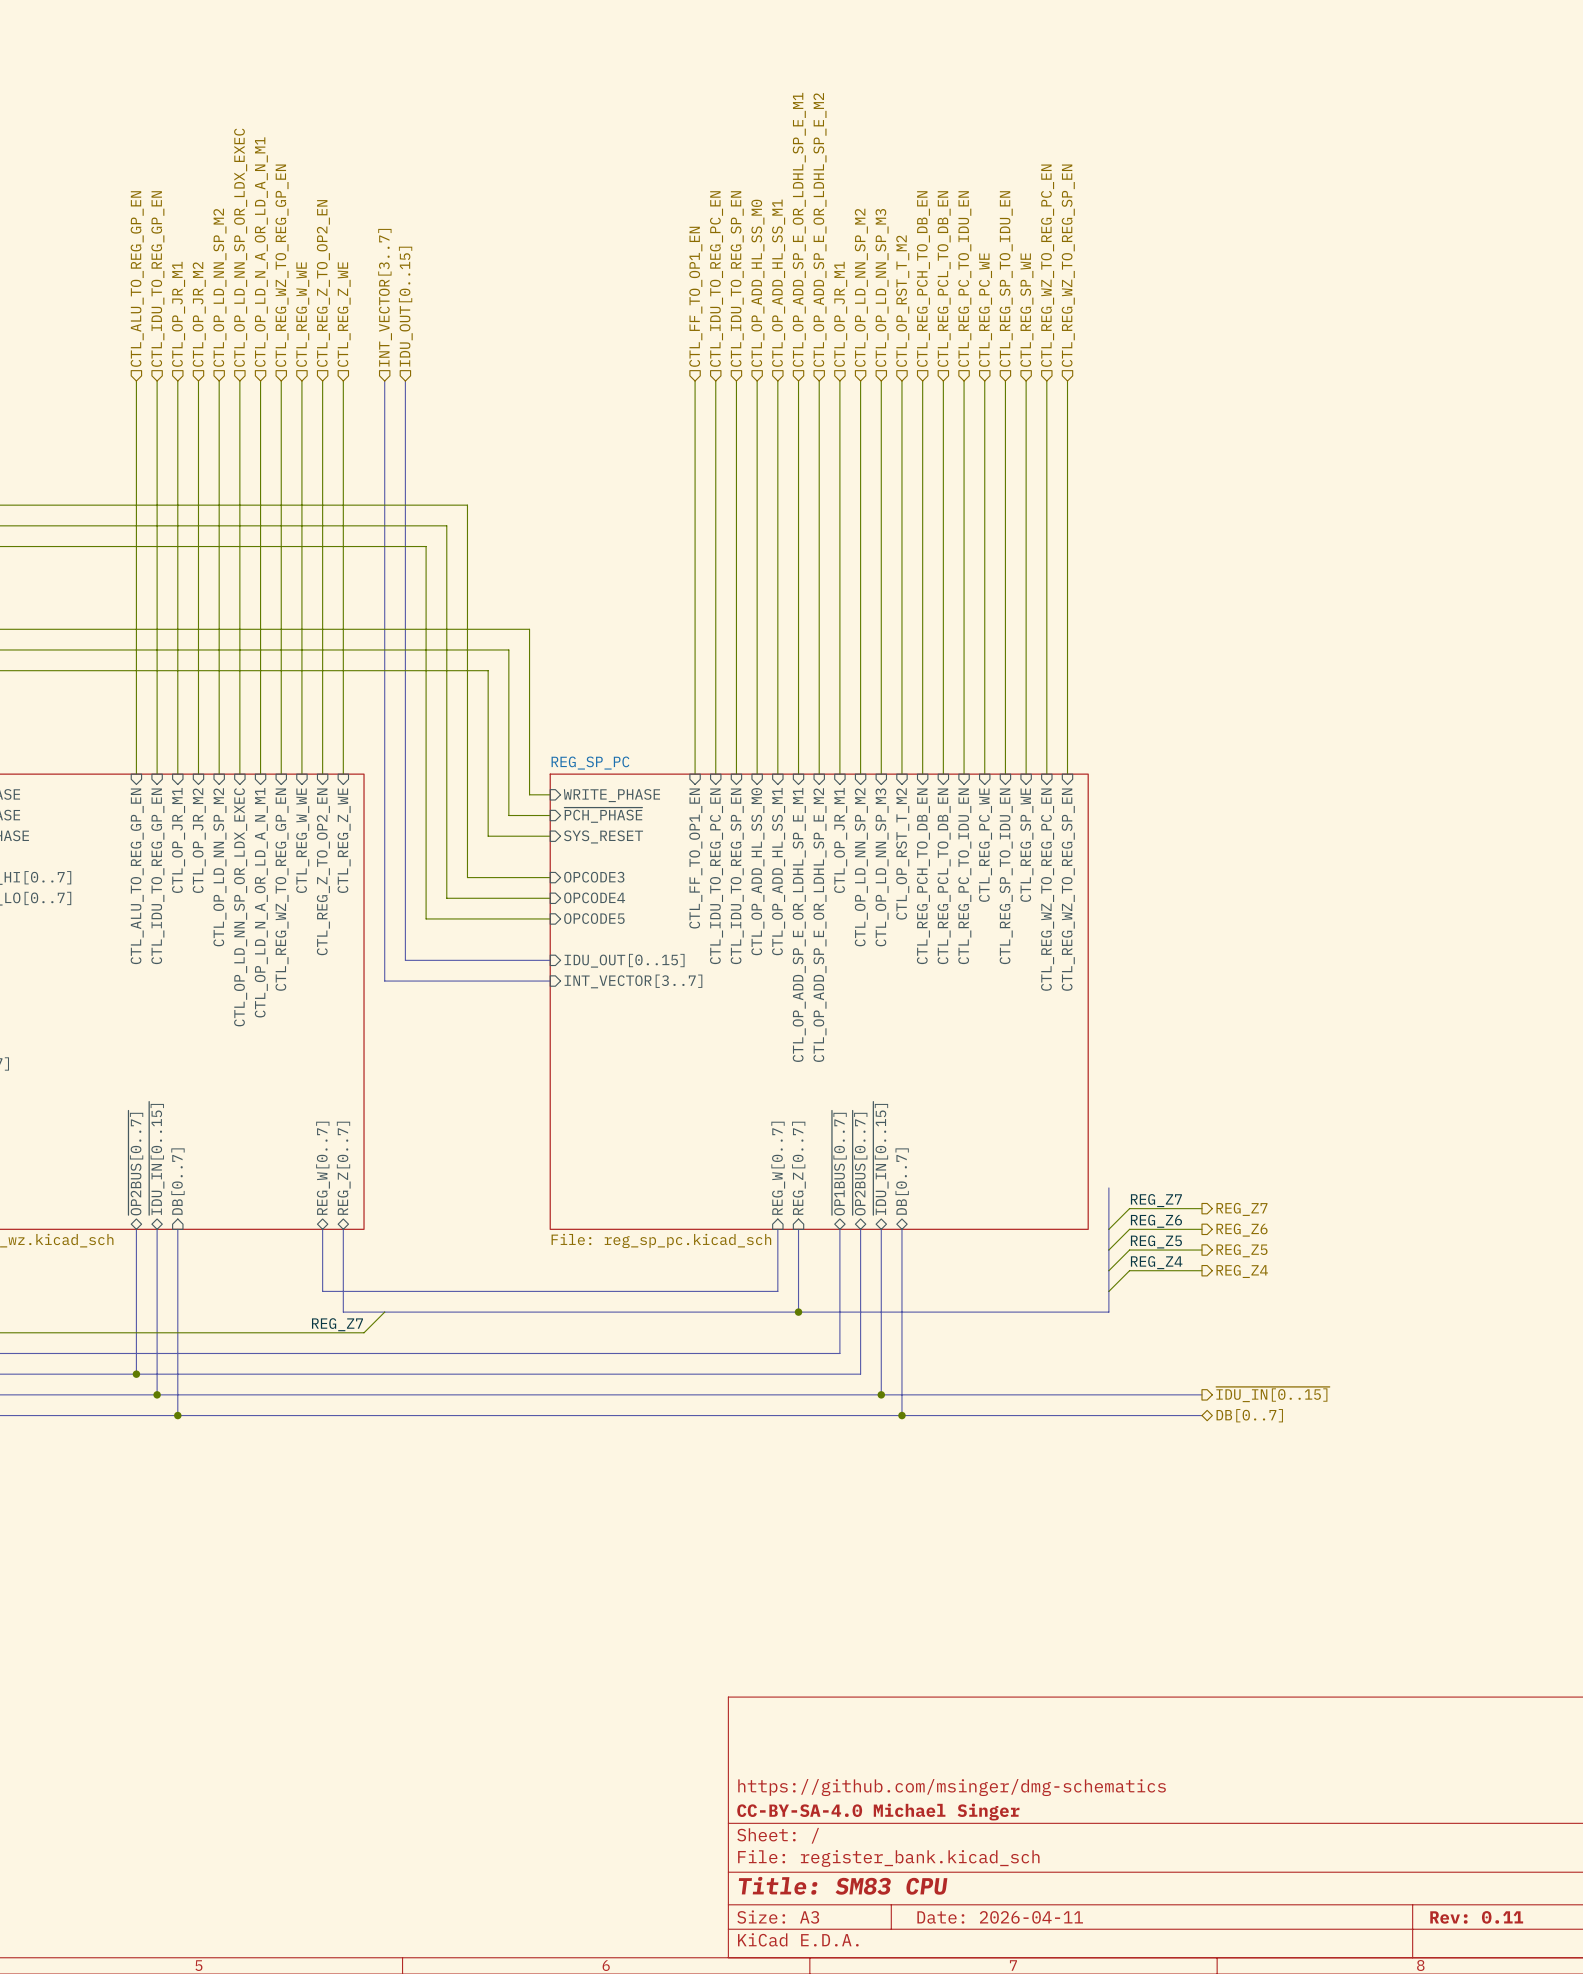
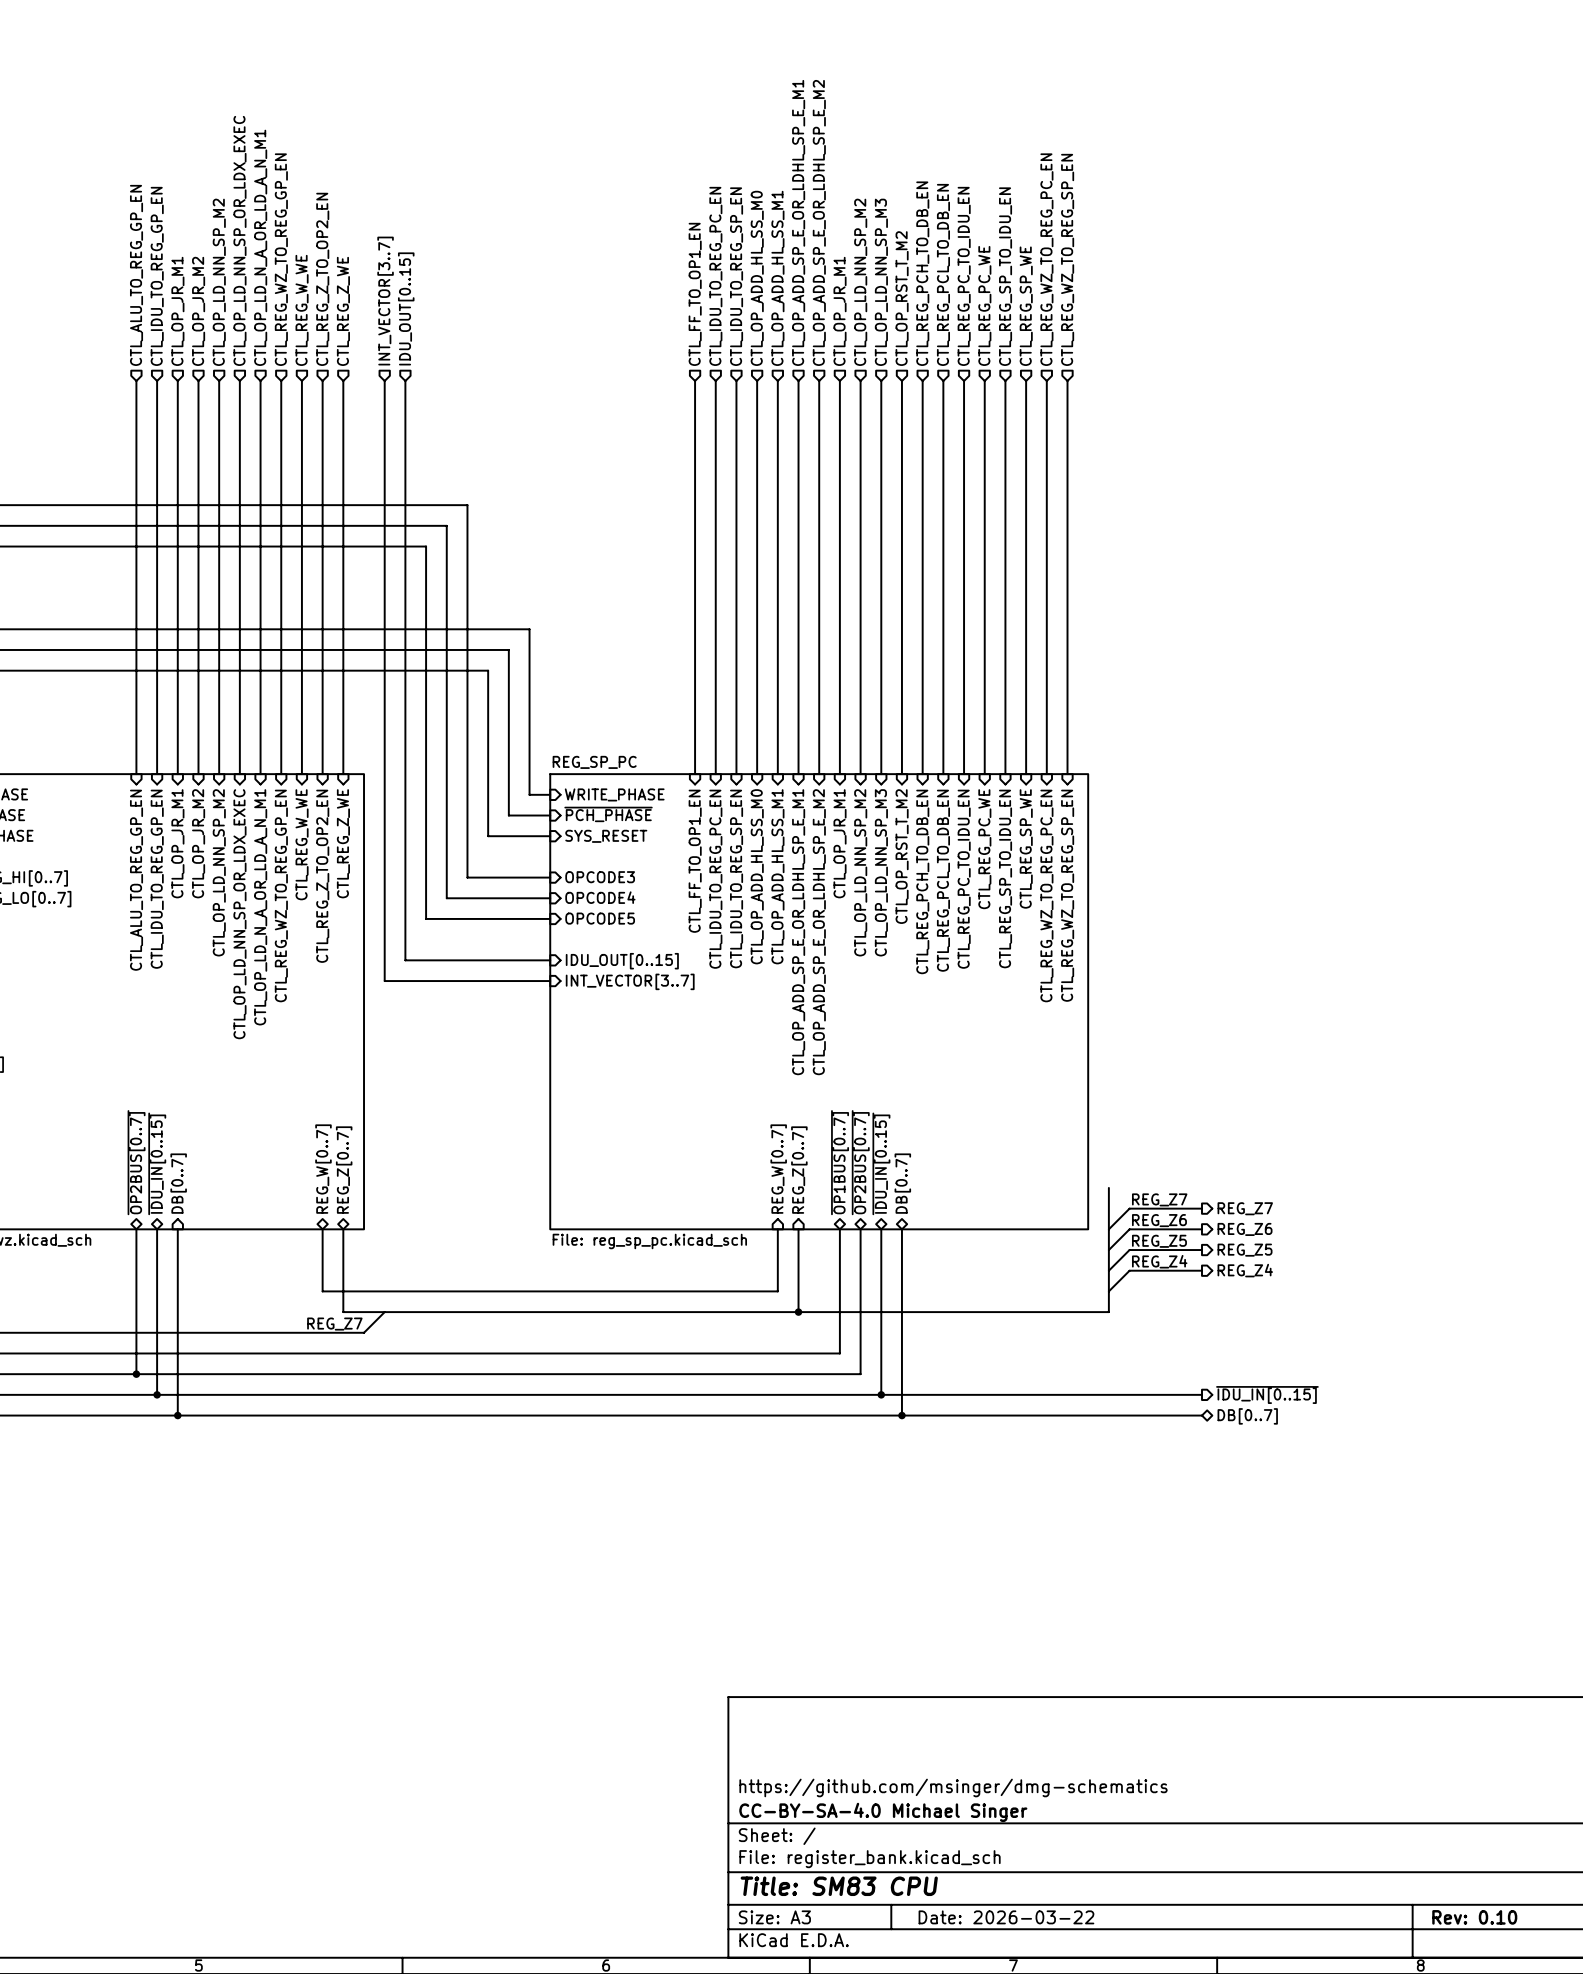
title block: Date: 2026-04-11 (1000, 1917) -> Date: 2026-03-22 (1006, 1917)
title block: Rev: 0.11 (1476, 1917) -> Rev: 0.10 (1474, 1917)

